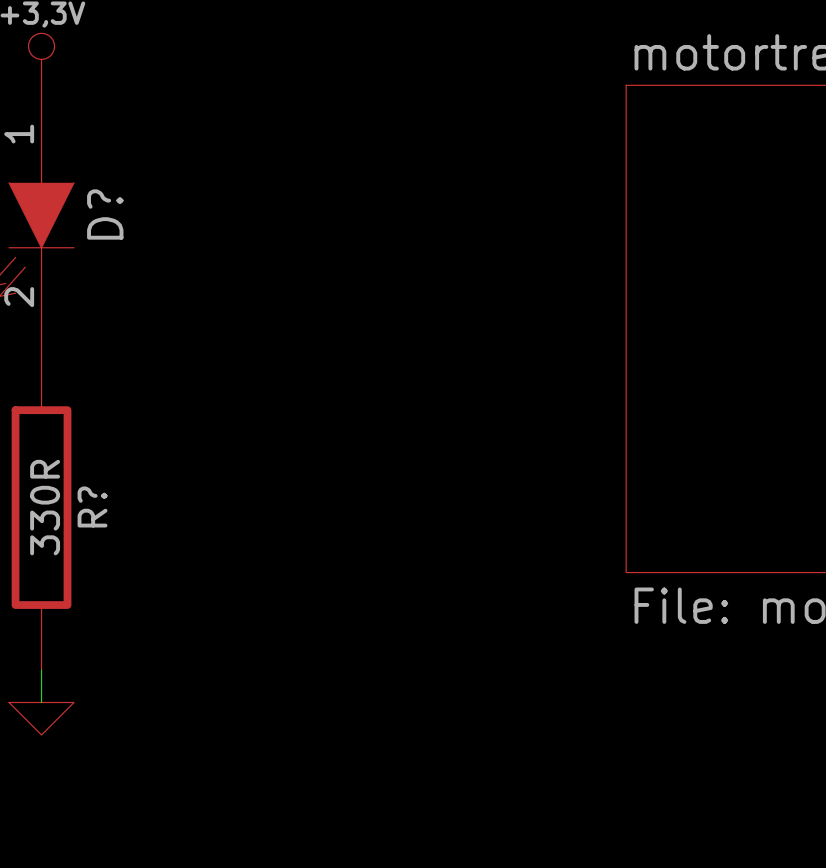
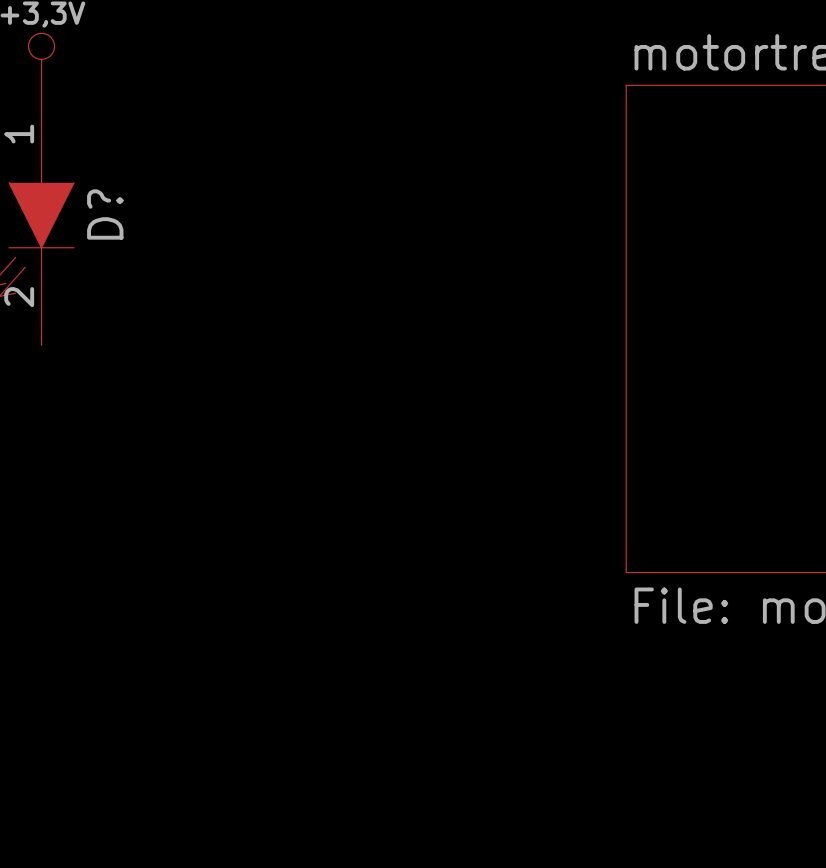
R?: 330R (41, 507) -> none
wire: (41, 670) (41, 702) -> none
power symbol: (41, 718) -> none

